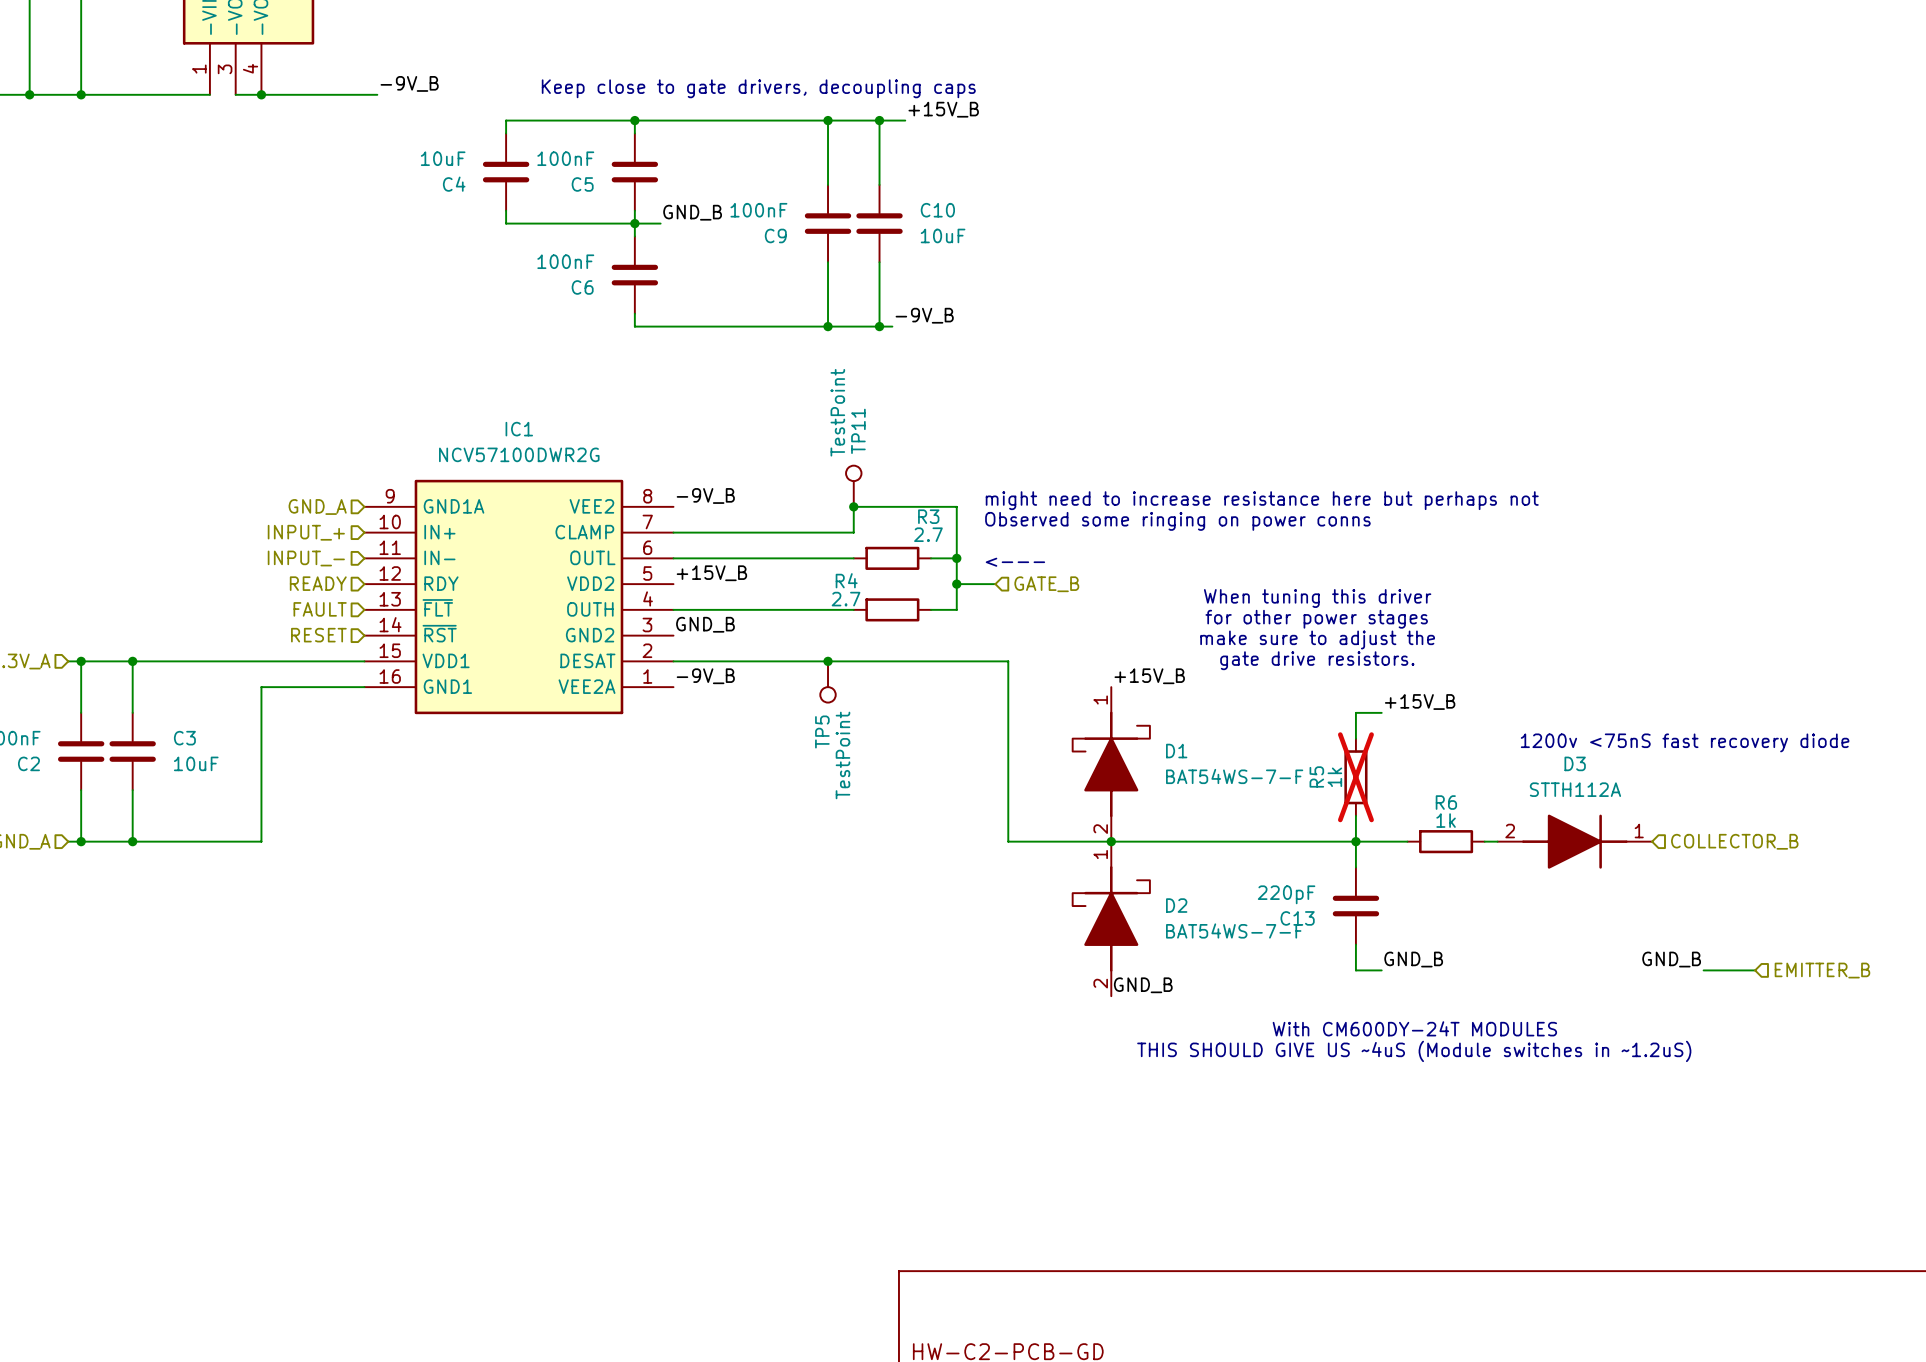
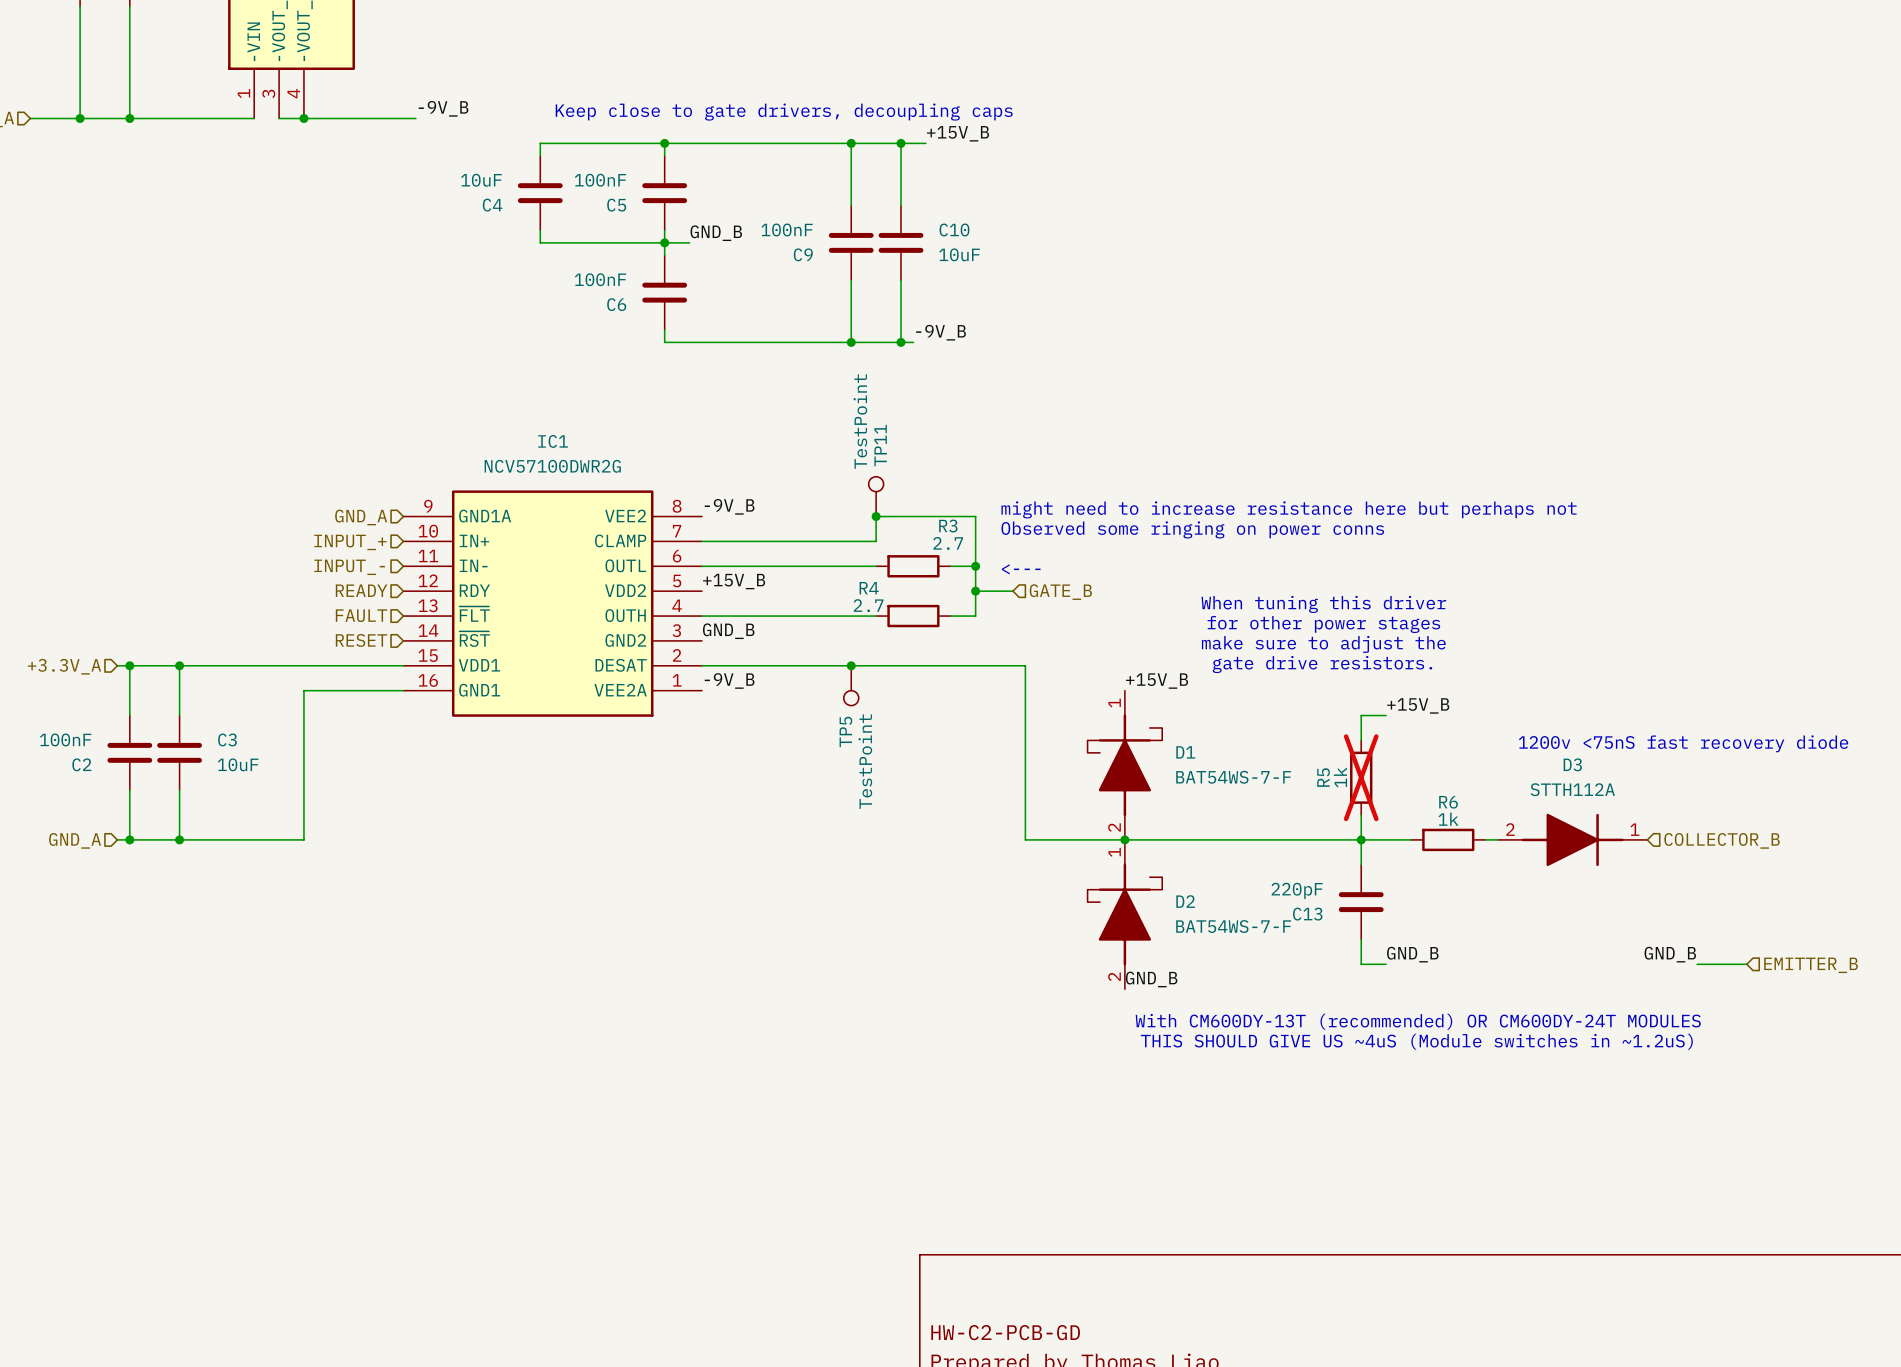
text: With CM600DY-24T MODULES (1414, 1028) -> With CM600DY-13T (recommended) OR CM600DY-24T MODULES (1418, 1021)

